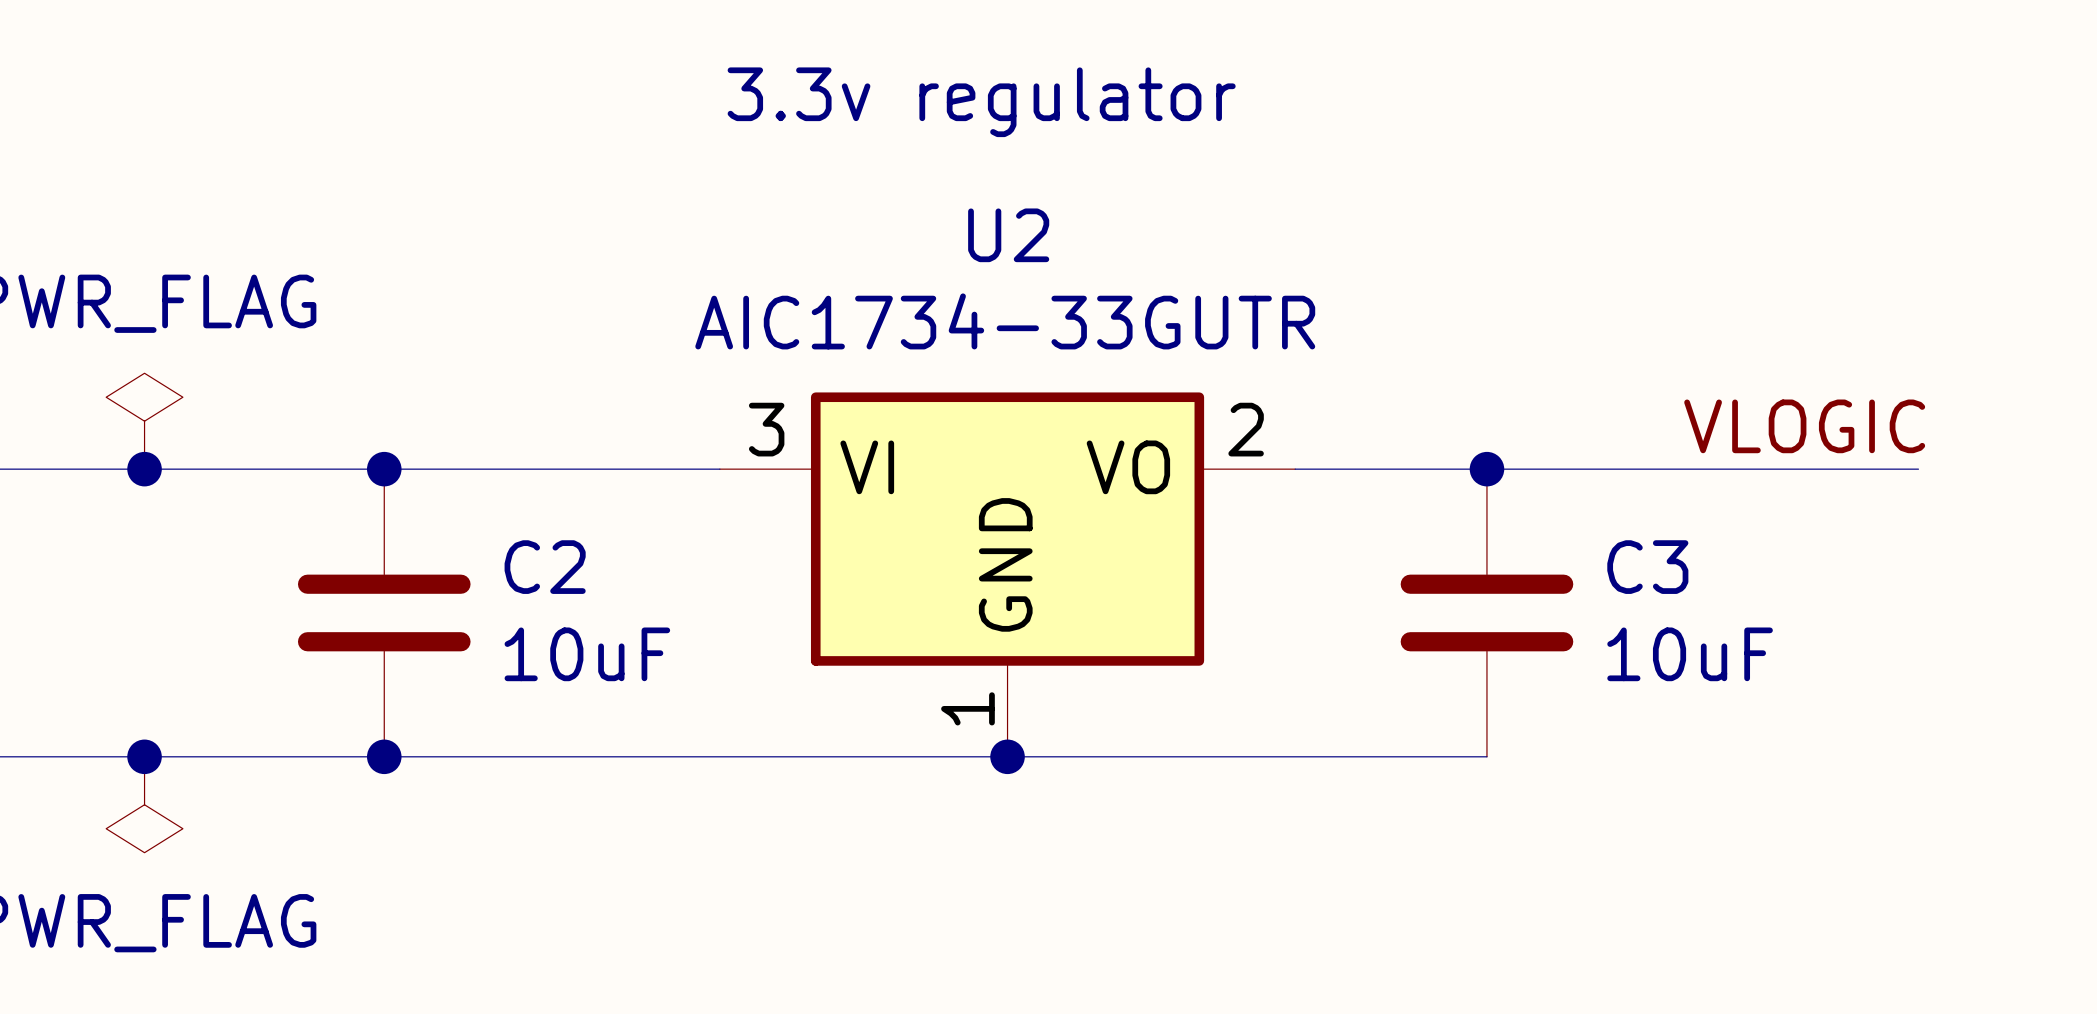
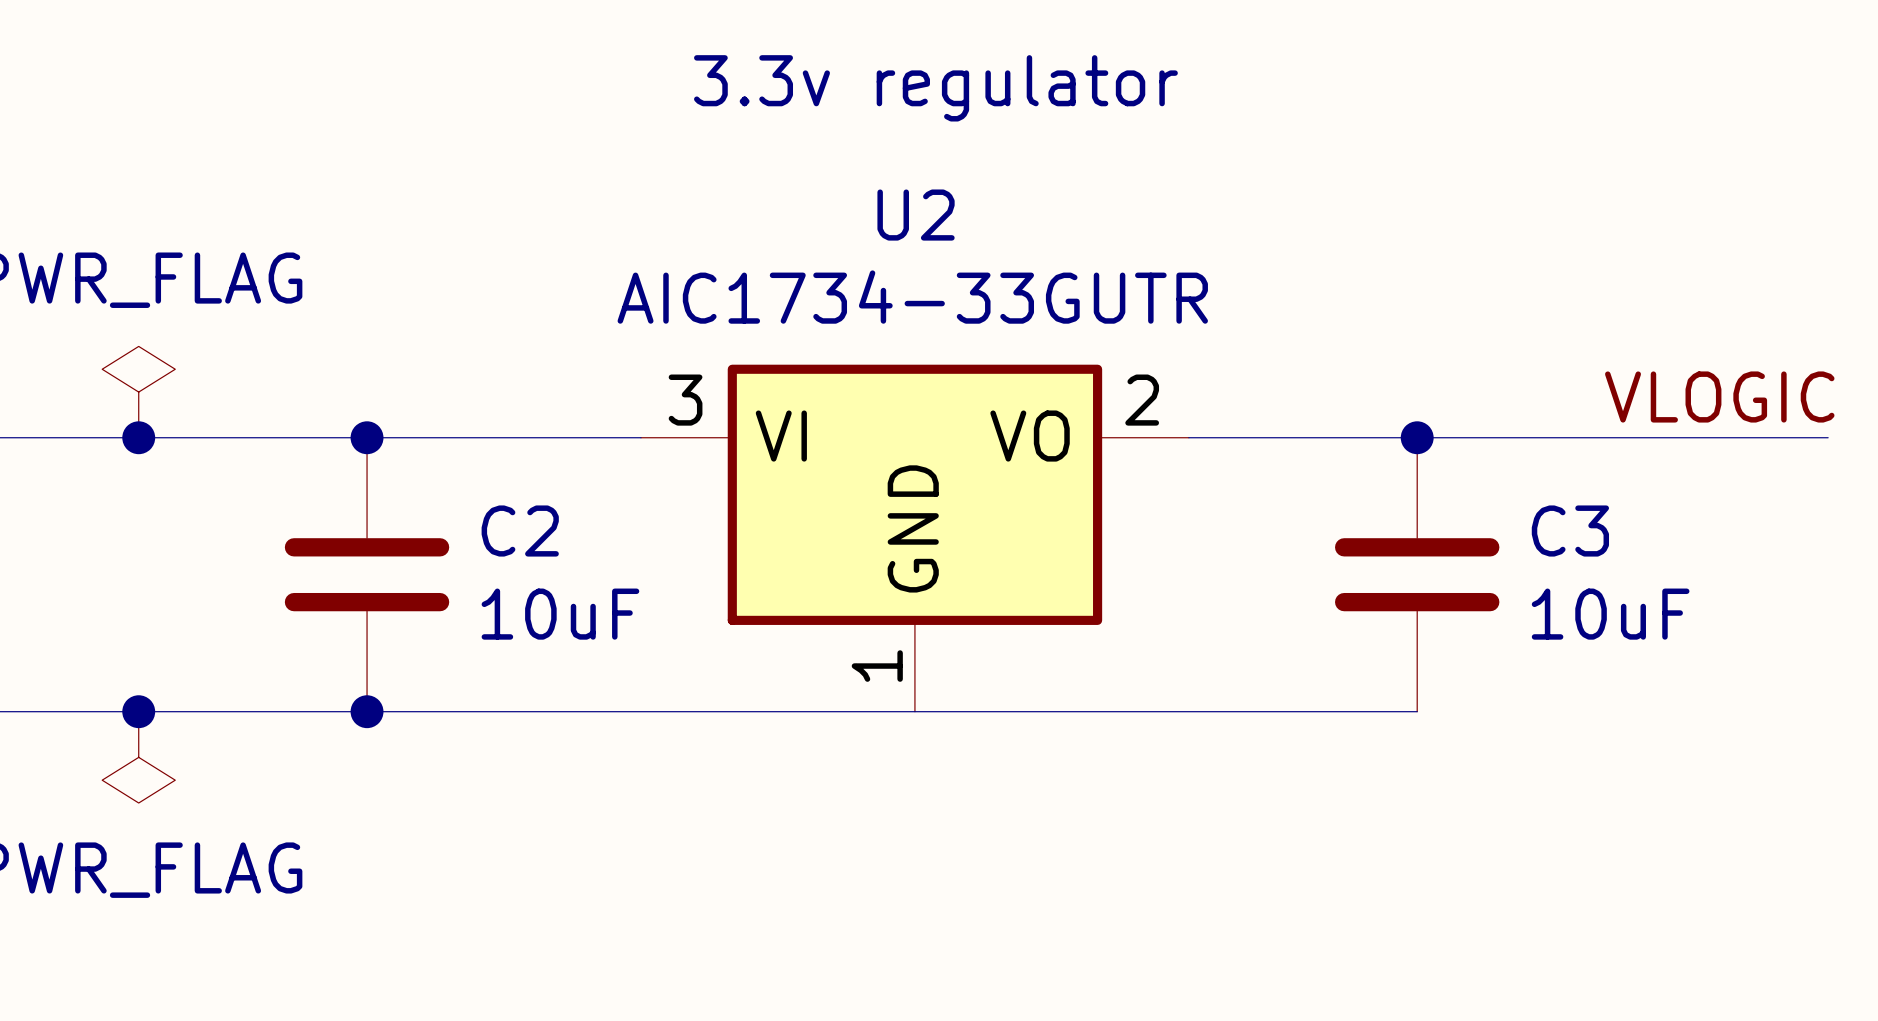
U2 position: (1007, 574) -> (914, 538)
junction: (1007, 756) -> none

